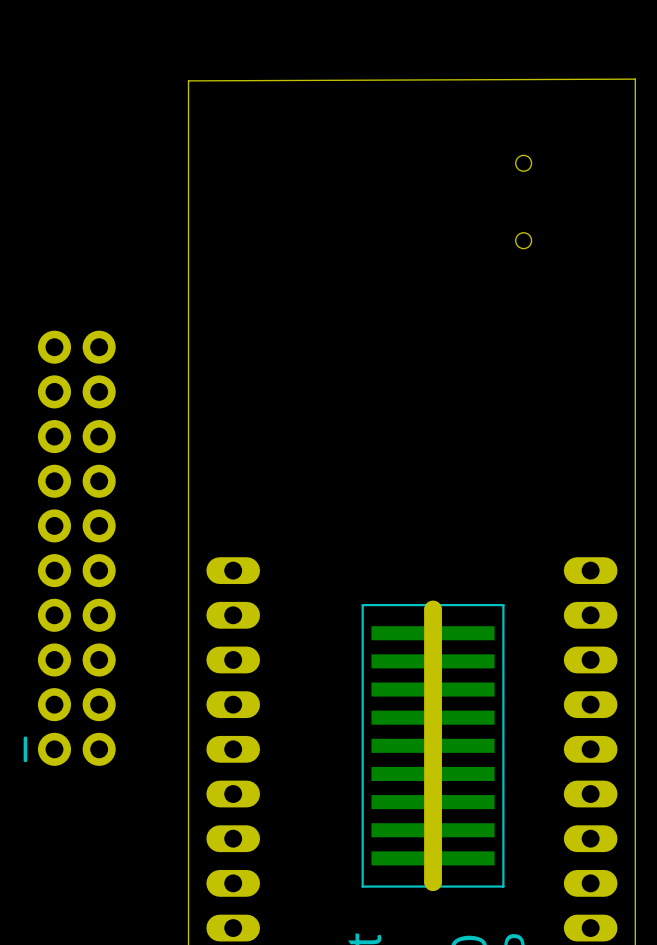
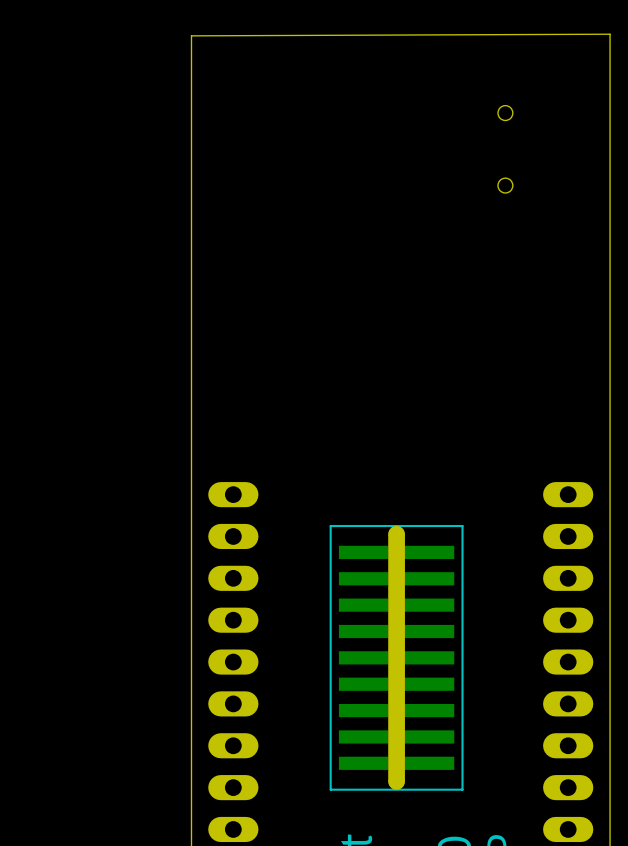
part: (69, 548) -> none
part: none -> (396, 657)
part: (433, 745) -> none

